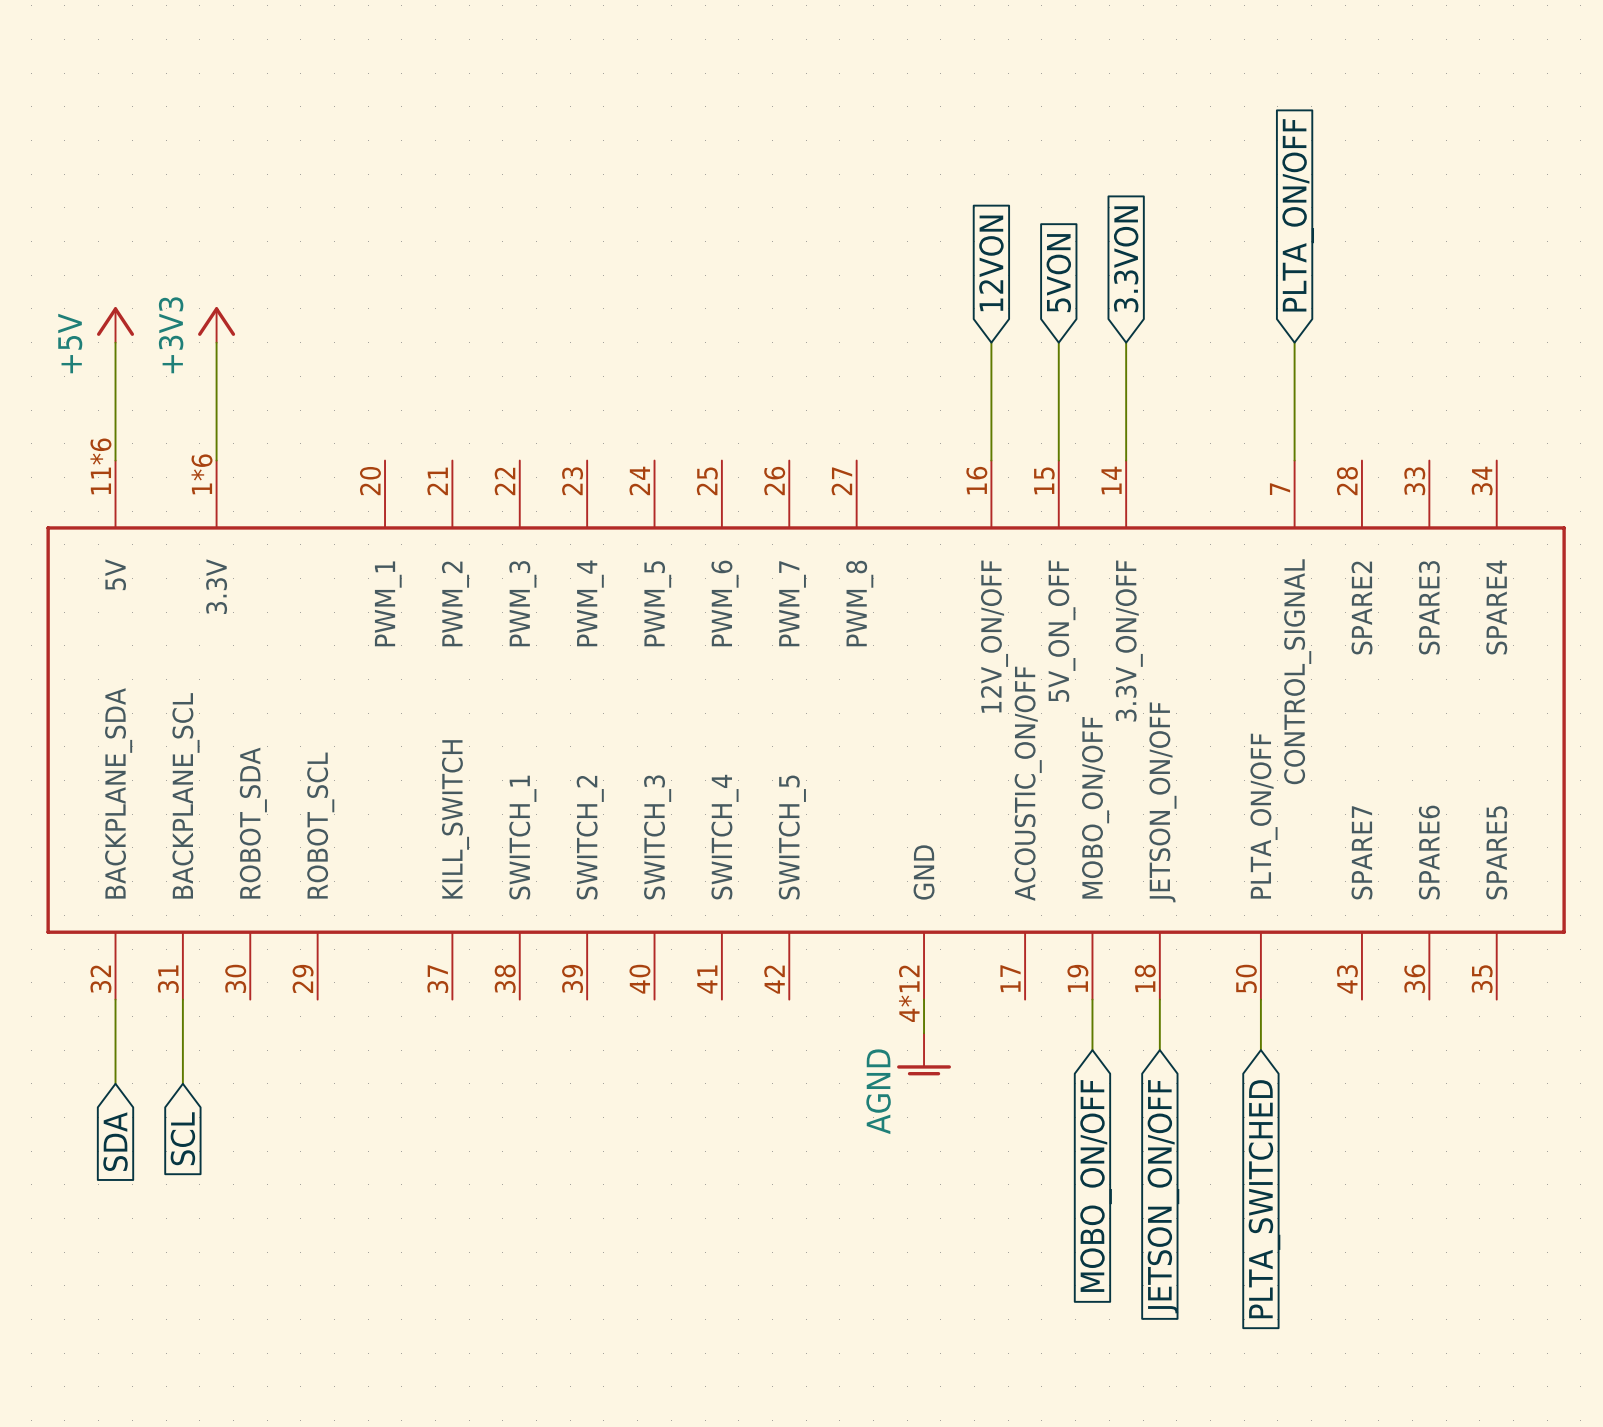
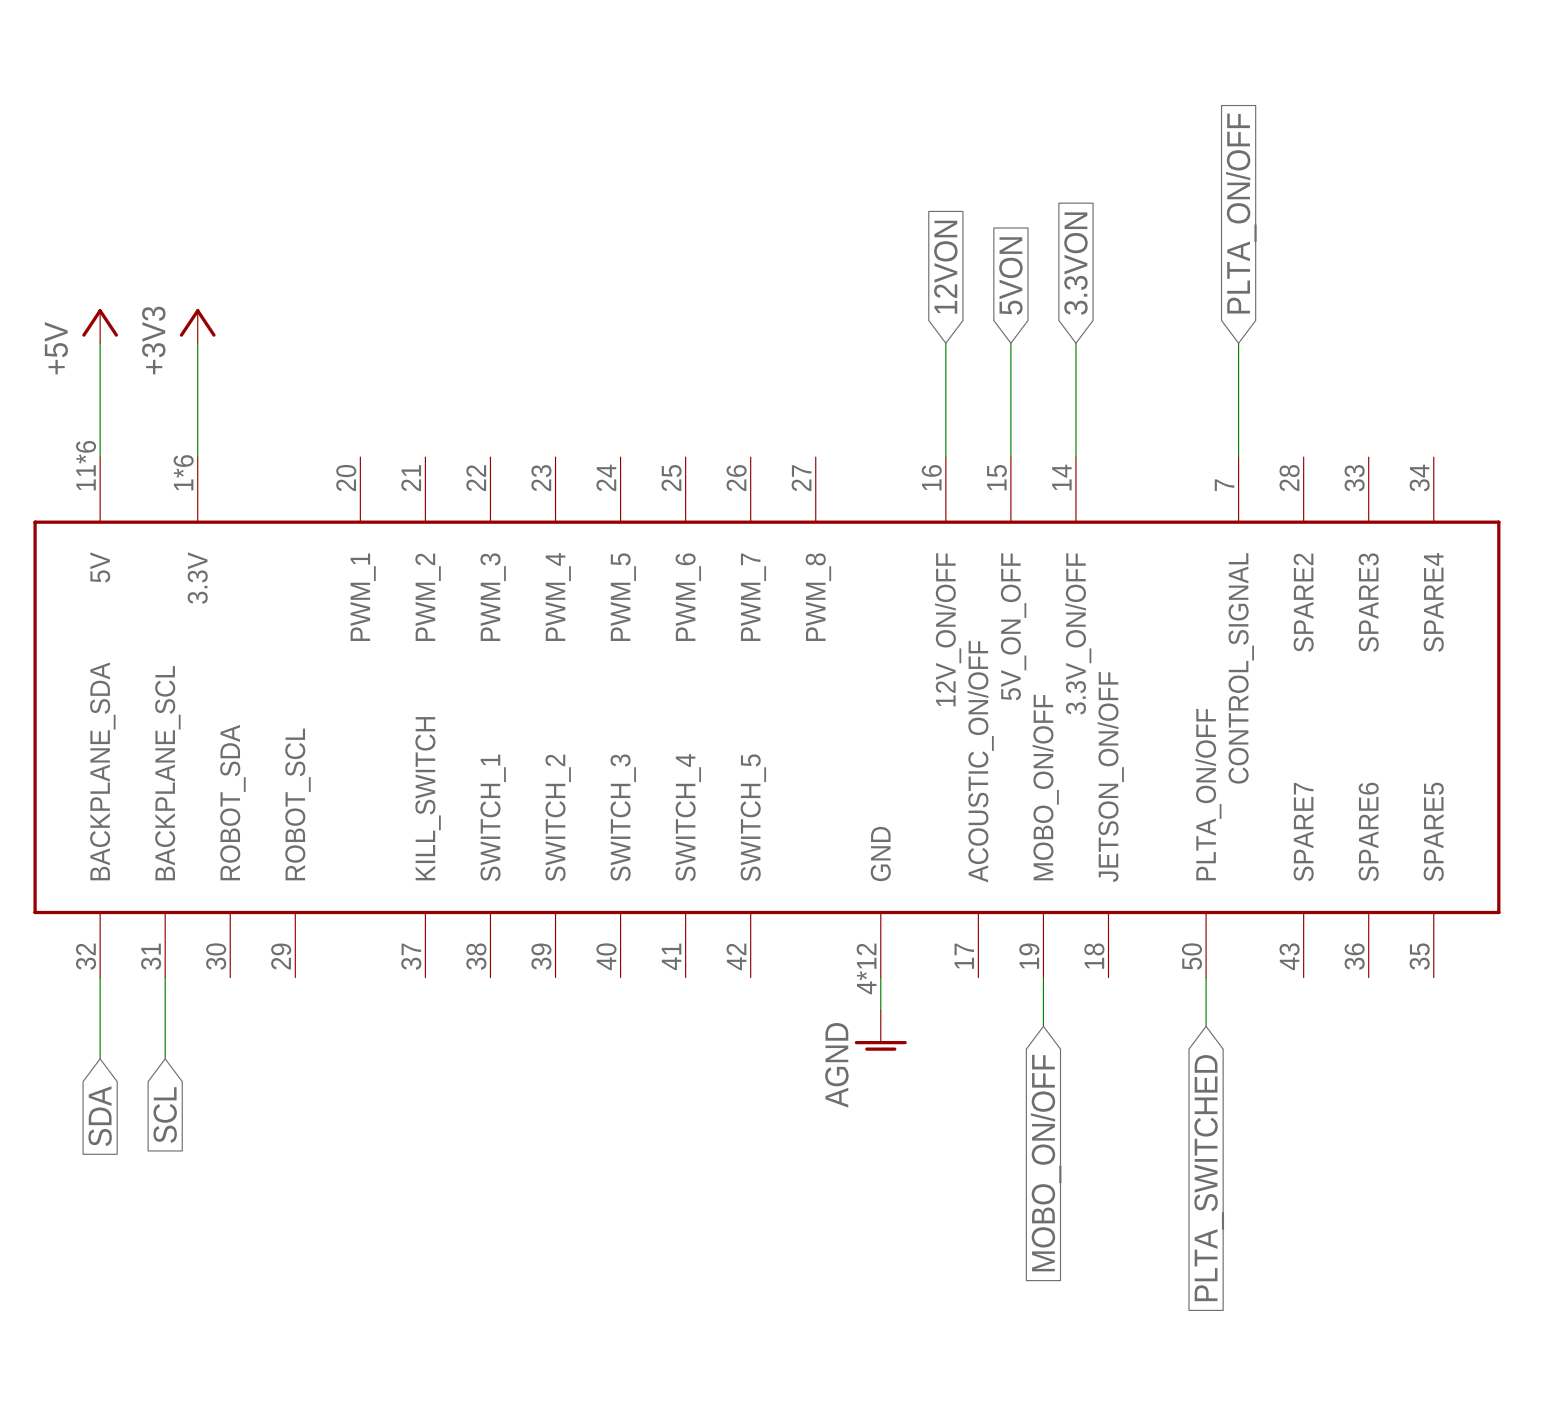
wire: (1159, 999) (1159, 1050) -> none
global label: JETSON_ON/OFF (1163, 1196) -> none

